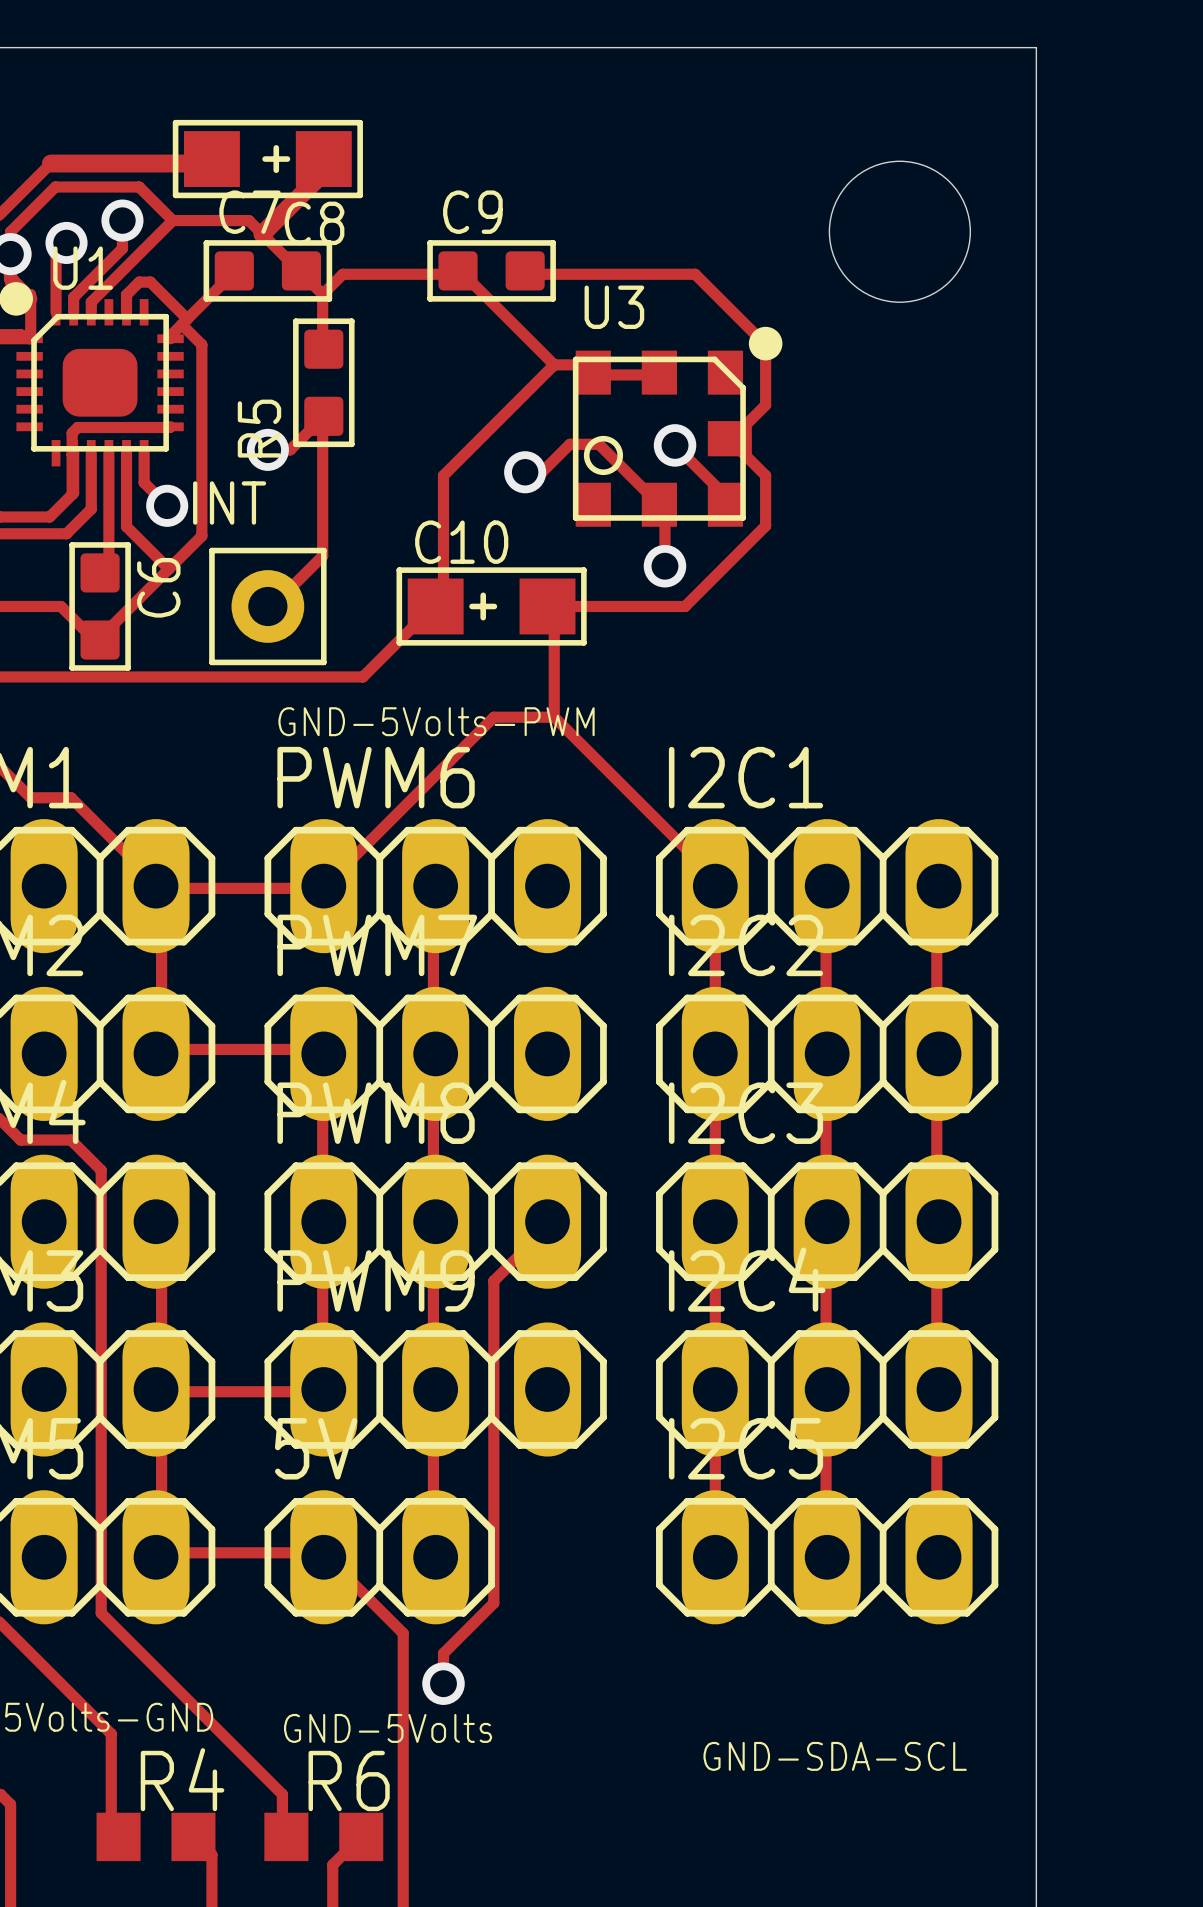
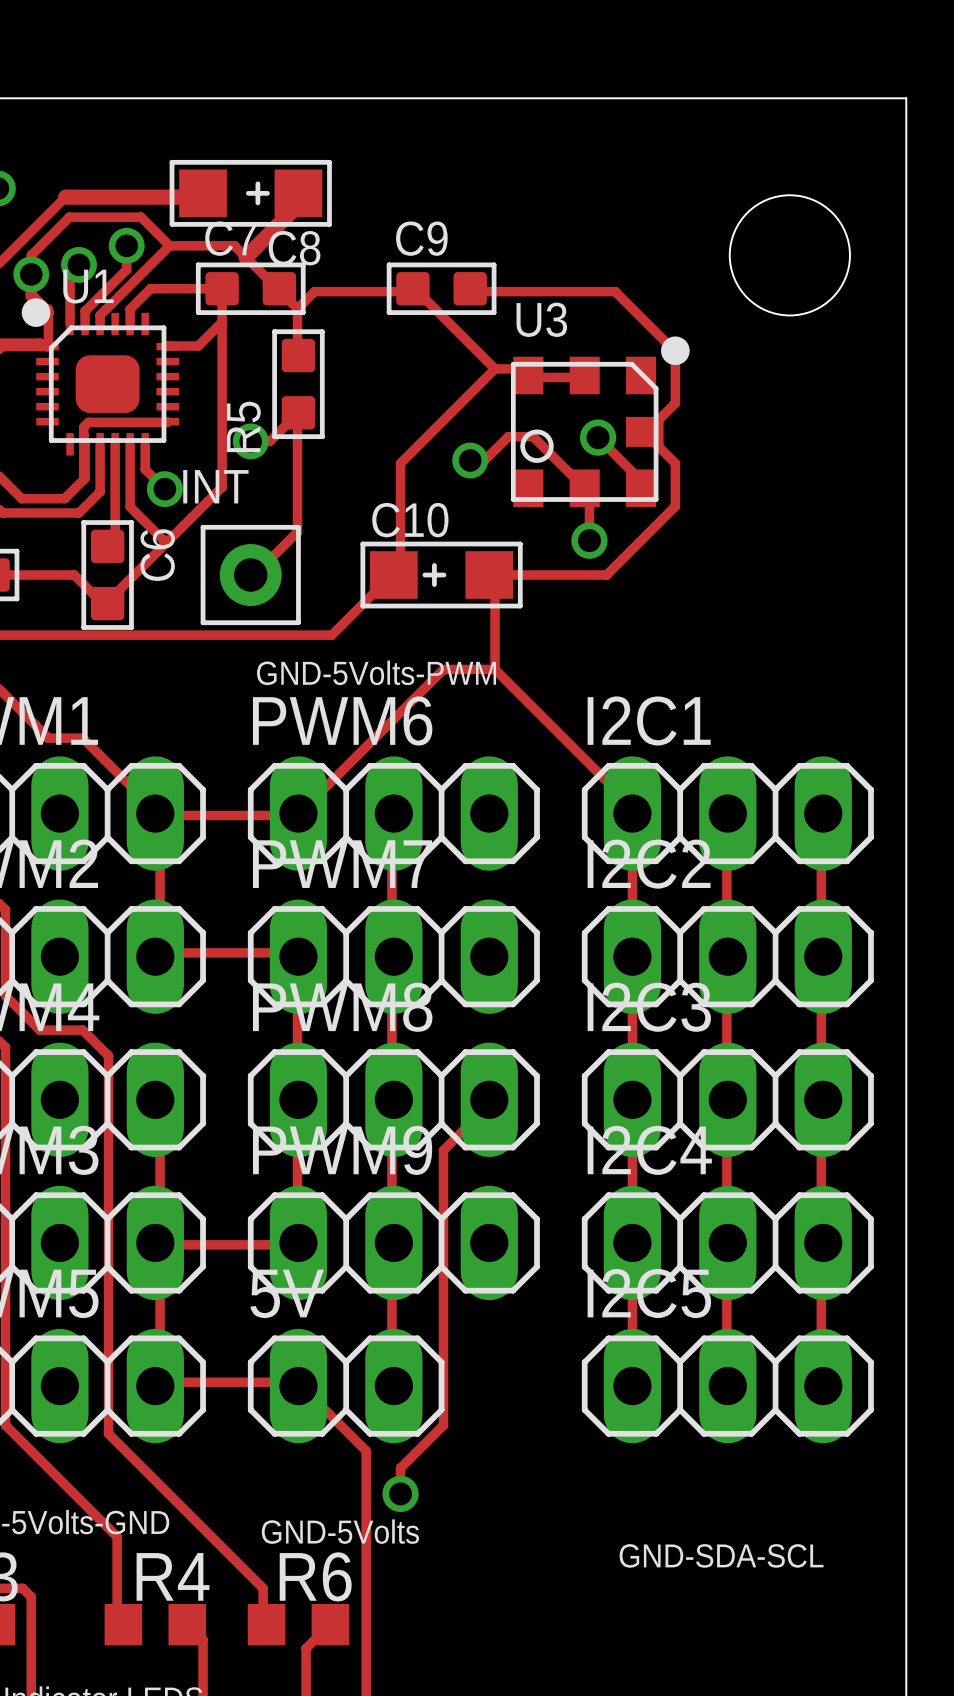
track: (234, 270) (171, 334) (170, 338) -> (222, 322) (198, 346) (167, 346)
track: (139, 282) (150, 282) (187, 319) -> none
track: (181, 324) (201, 344) (201, 536) -> (141, 298) (150, 288) (222, 288) (222, 487) (194, 514)

